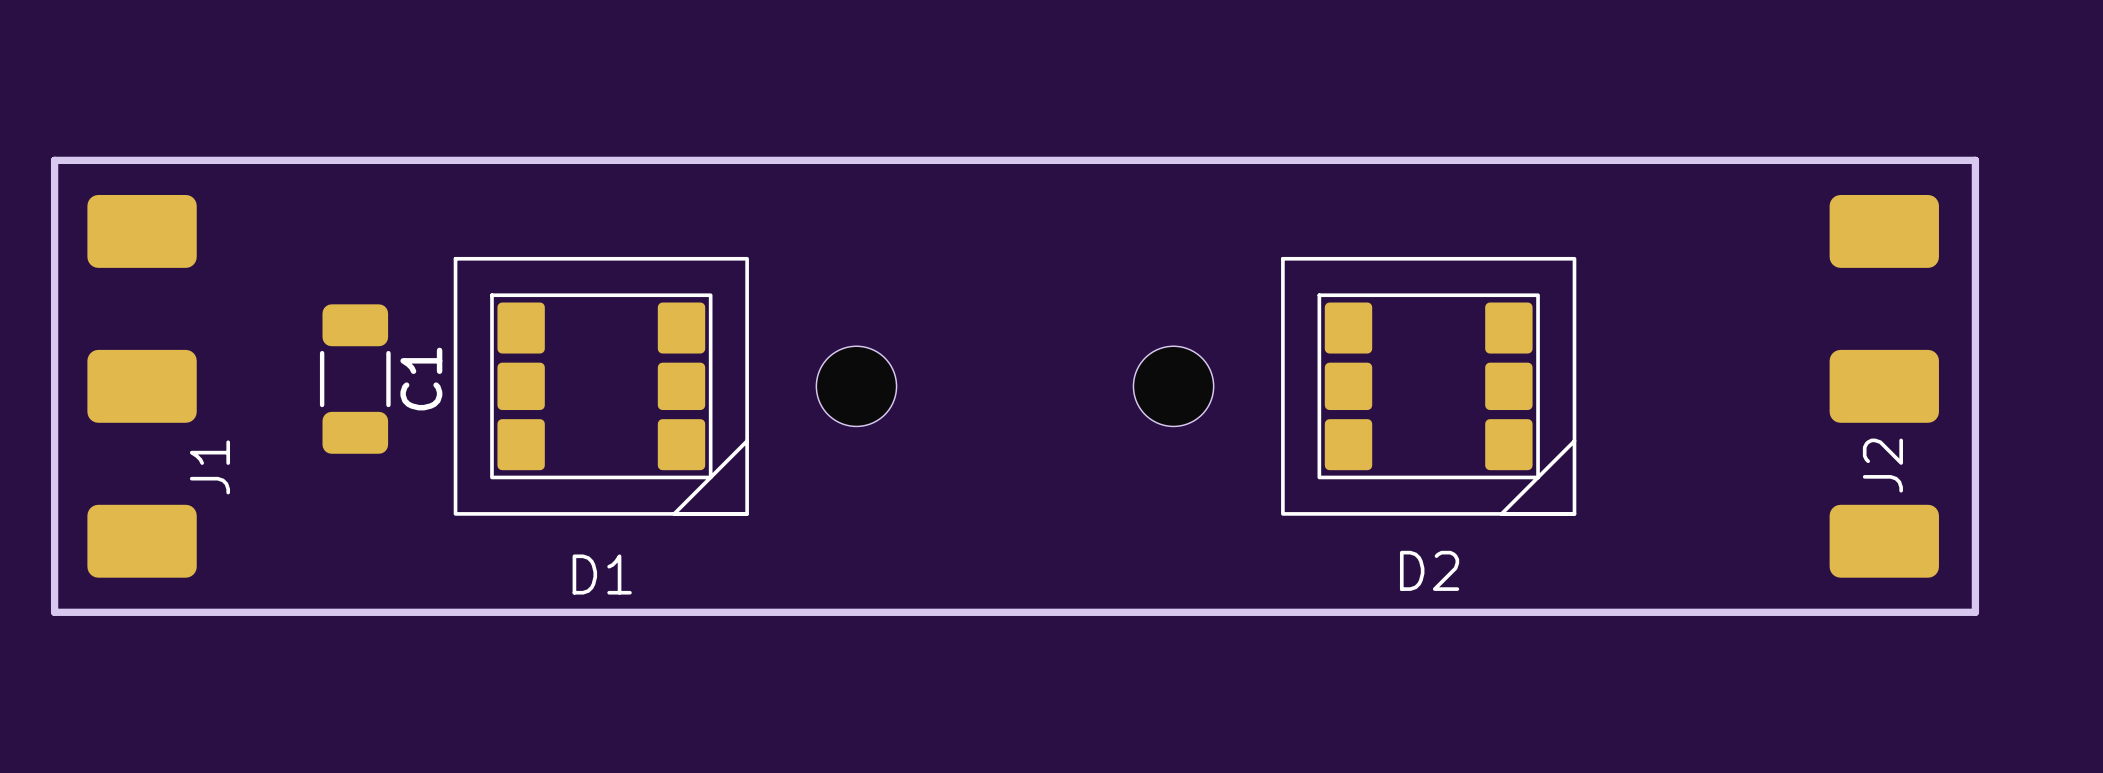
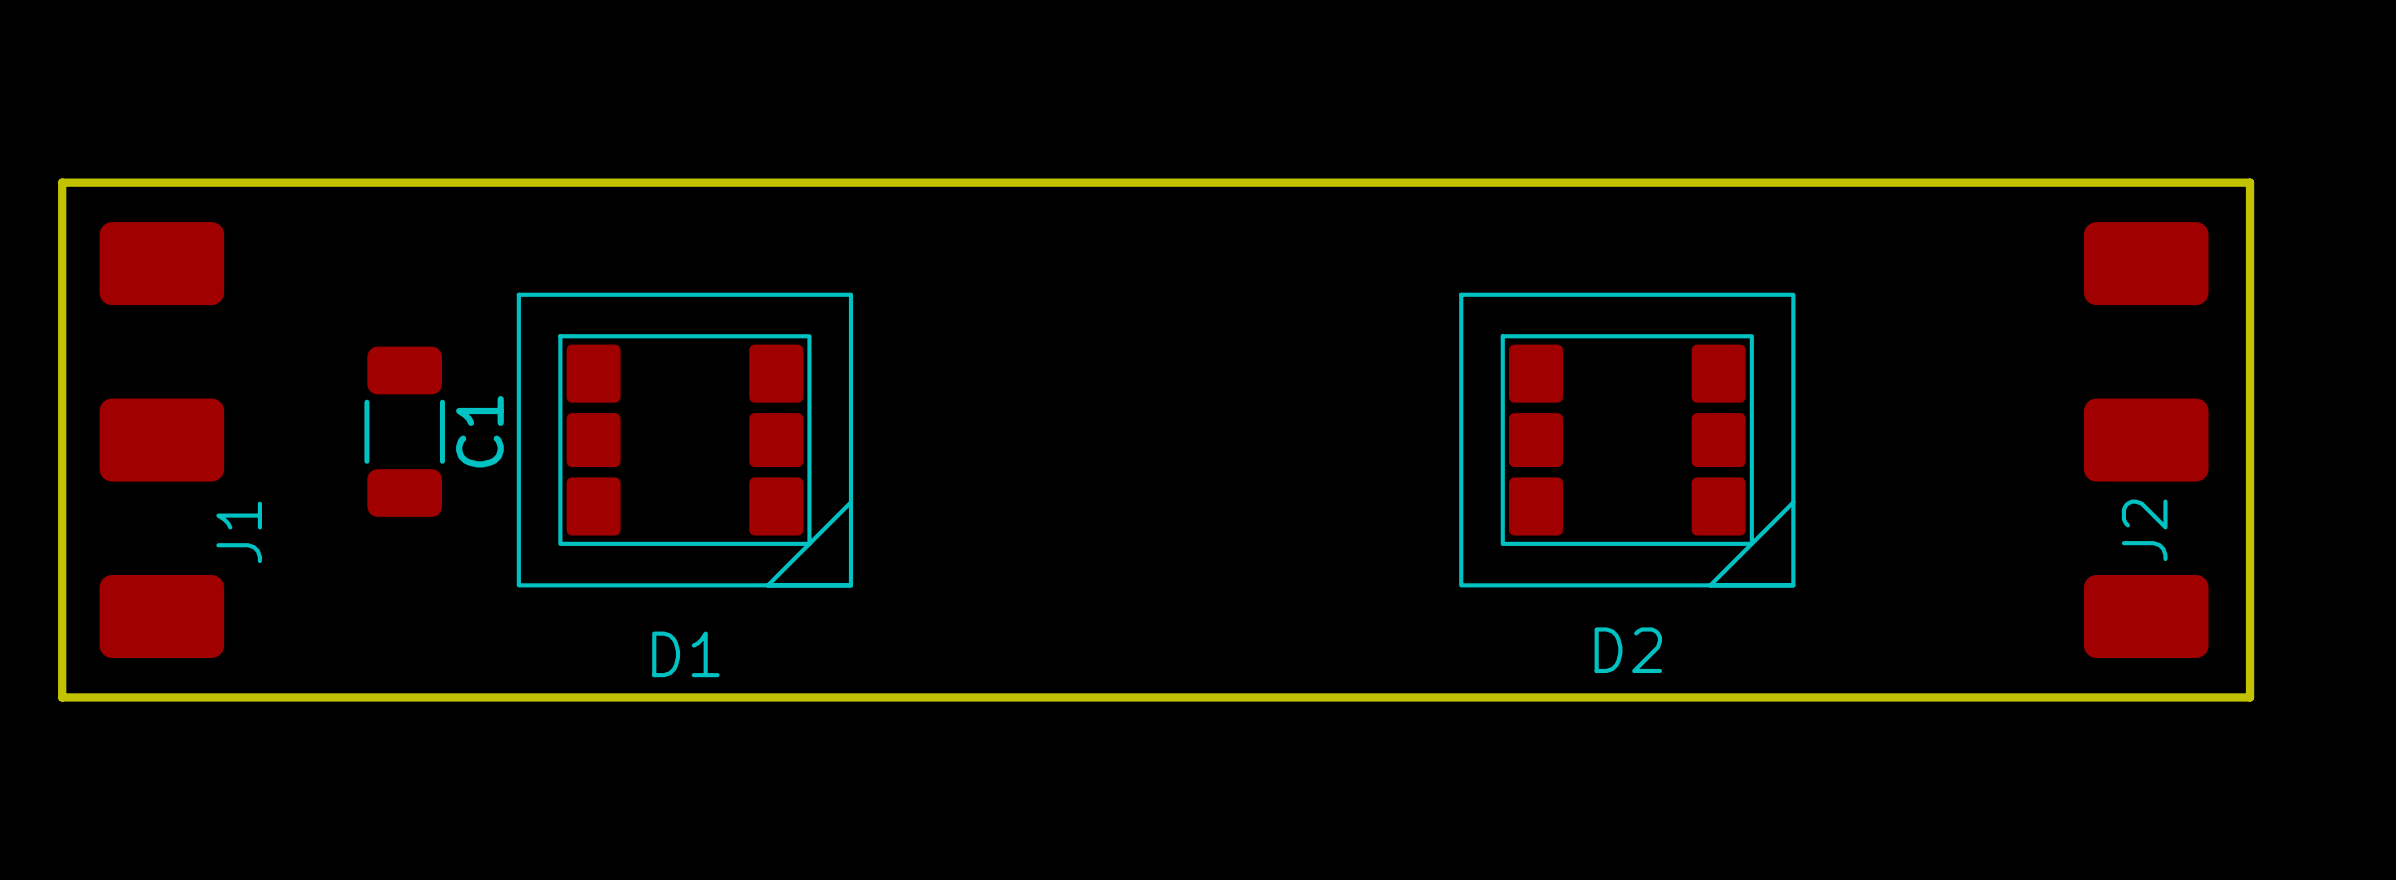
part: (856, 386) -> none
part: (1173, 386) -> none

